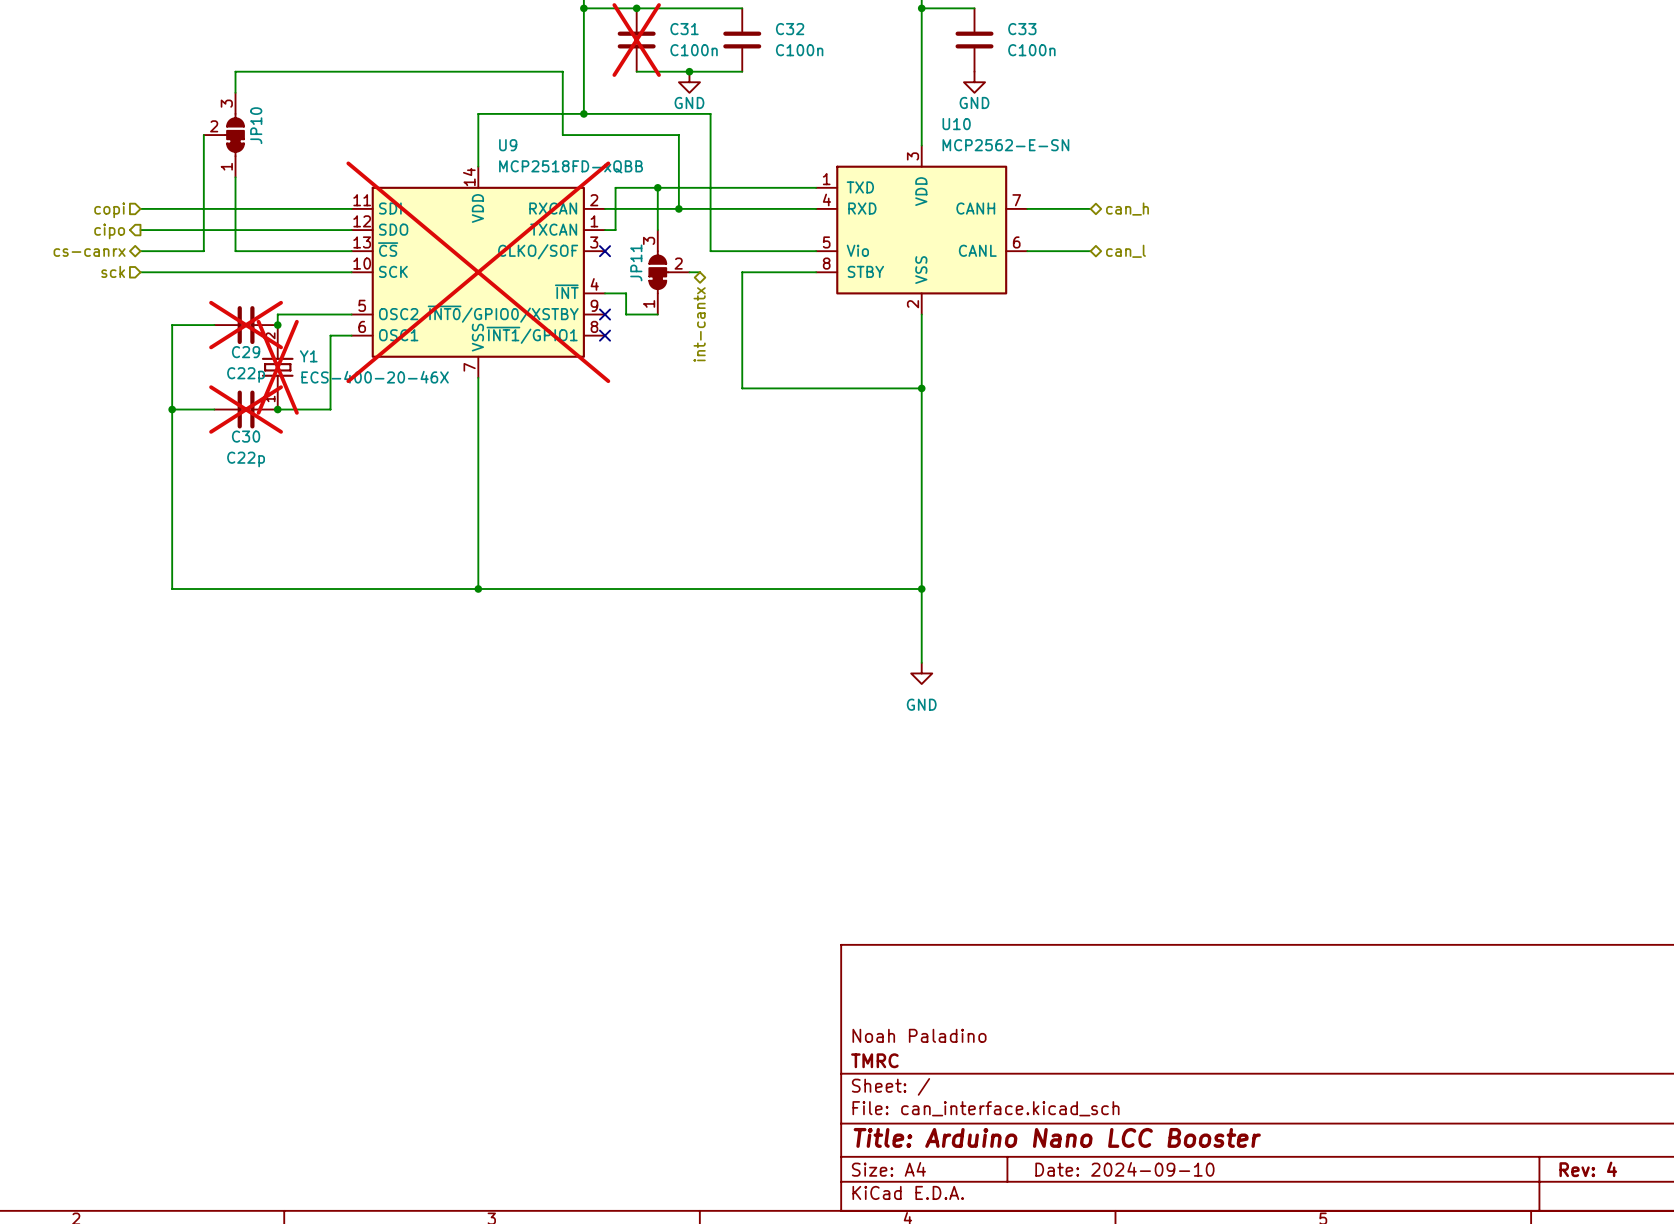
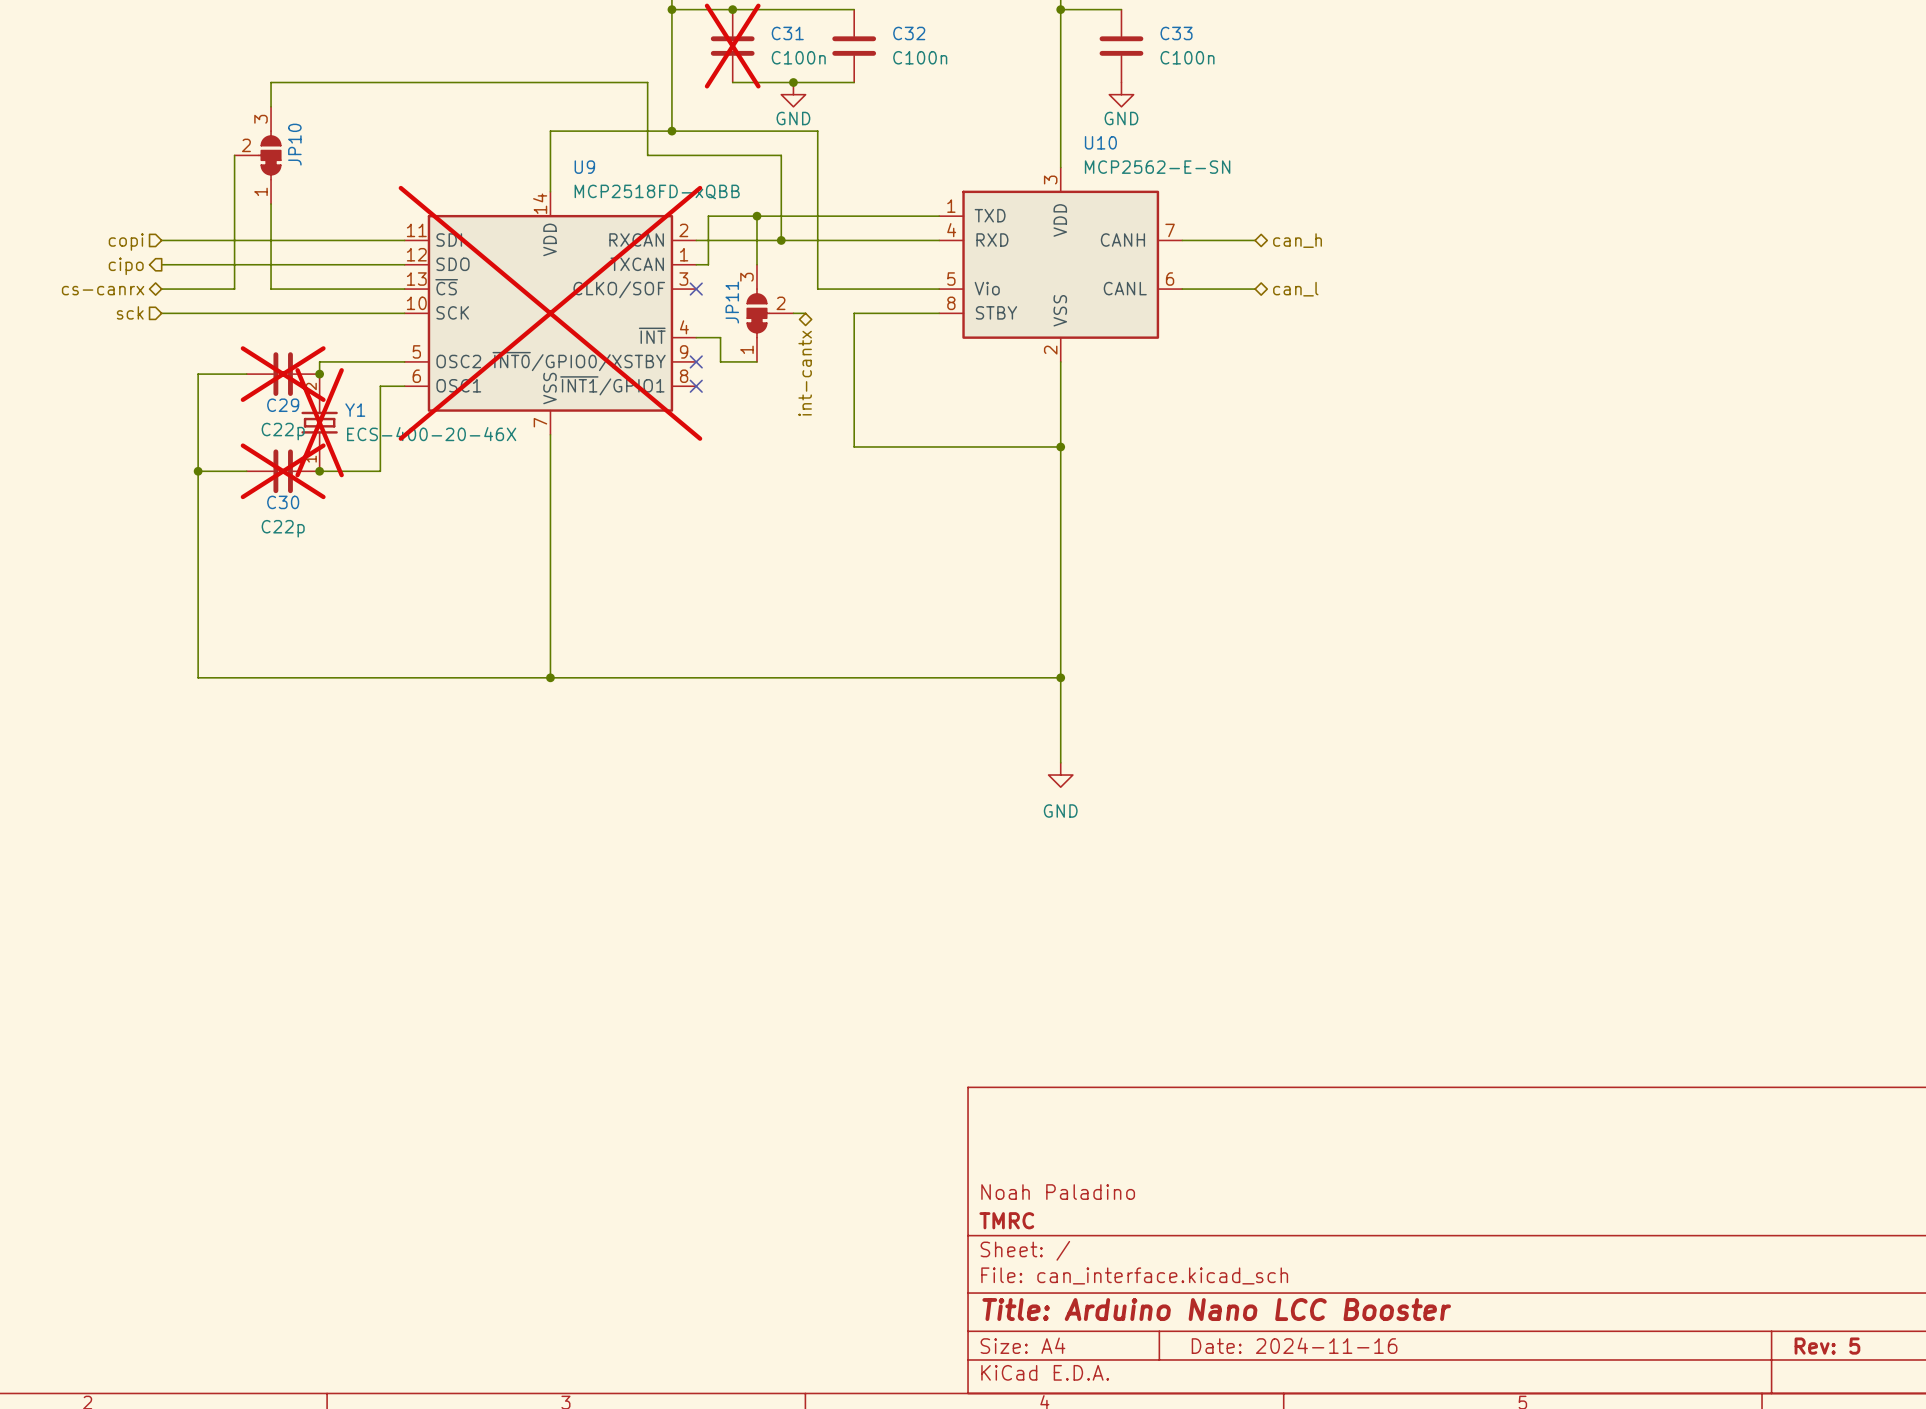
title block: Date: 2024-09-10 (1124, 1169) -> Date: 2024-11-16 (1294, 1345)
title block: Rev: 4 (1588, 1169) -> Rev: 5 (1827, 1346)

